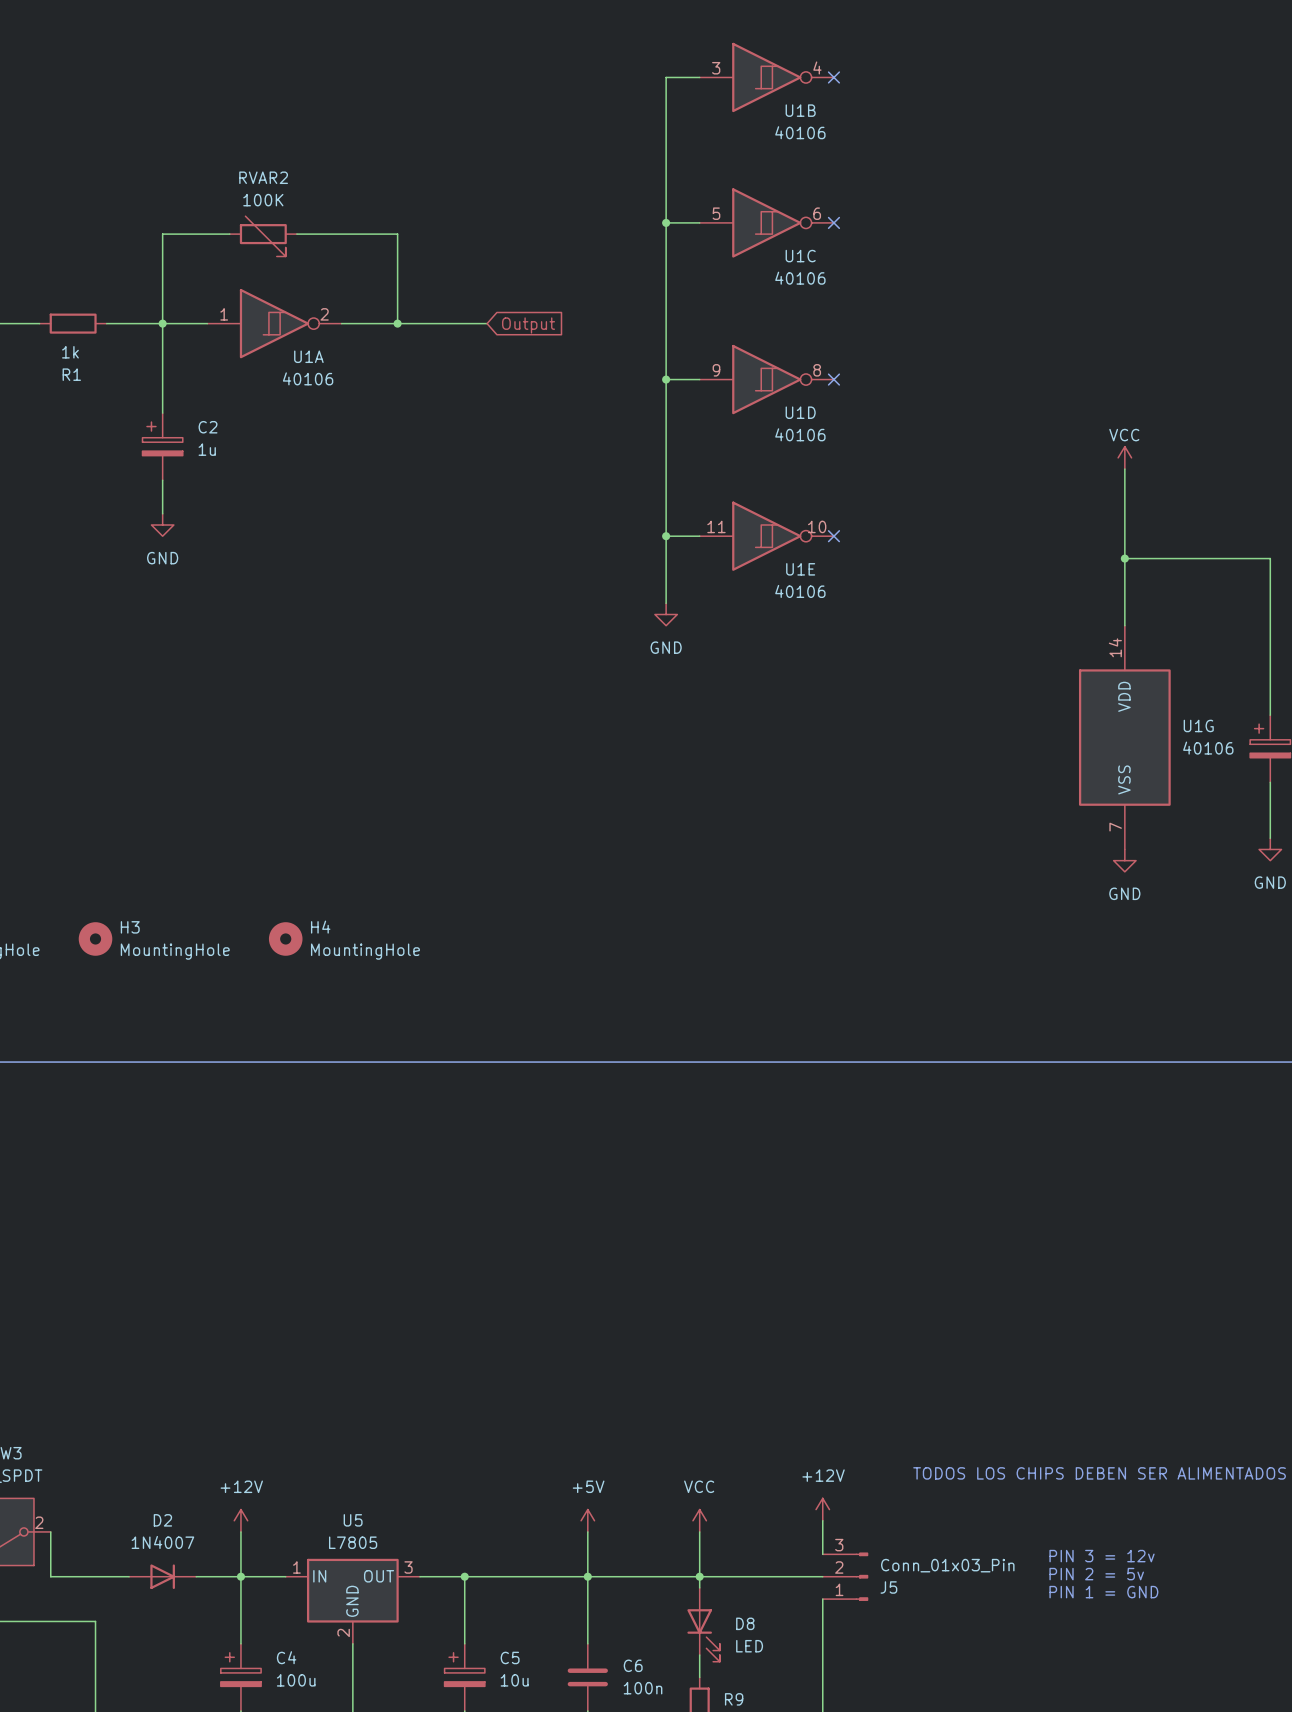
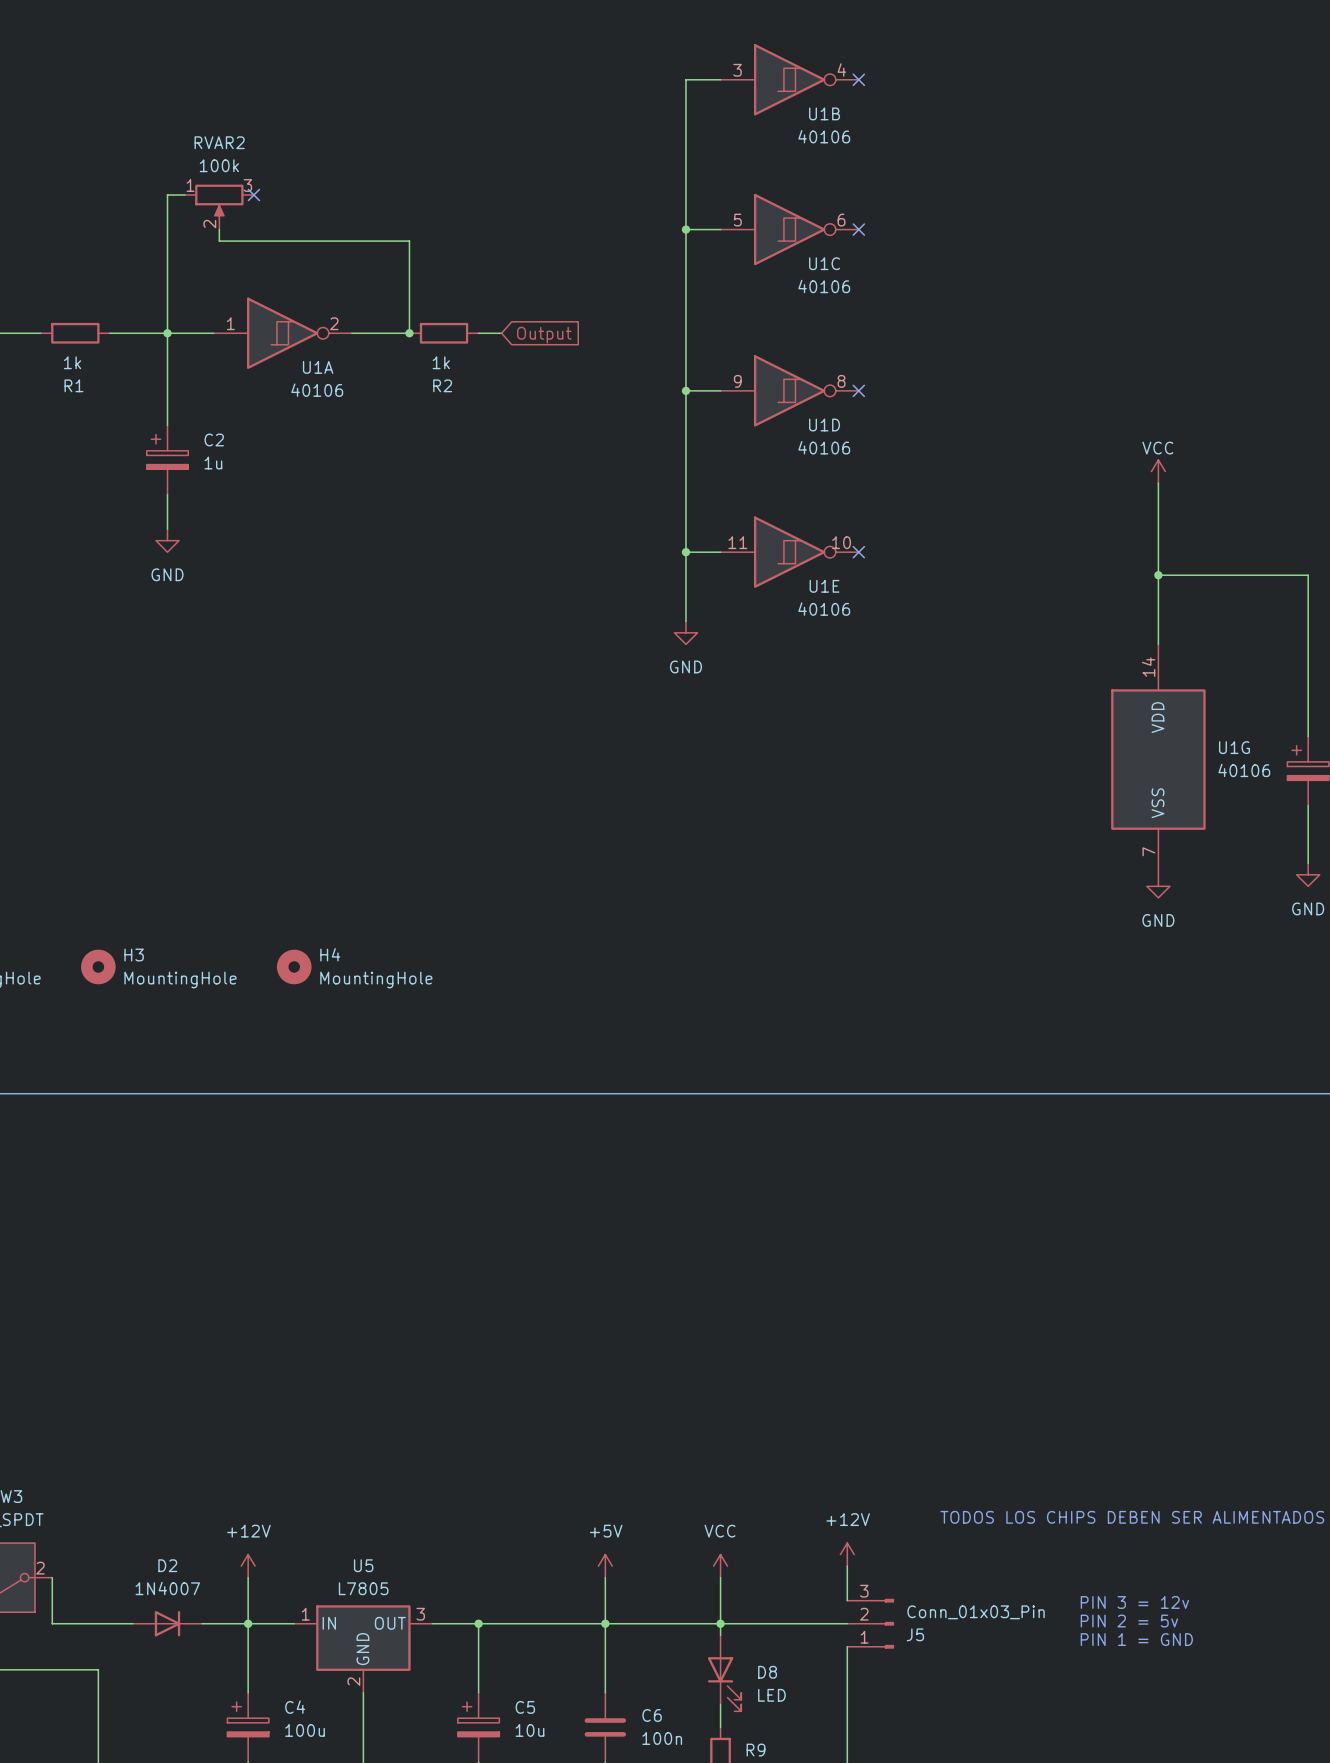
wire: none -> (184, 195) (167, 195) (167, 241)
no-connect mark: none -> (253, 195)
RVAR2 value: 100K (263, 200) -> 100k (219, 165)
RVAR2 symbol: [229, 216, 297, 257] -> [184, 184, 254, 230]
wire: (162, 234) (212, 234) -> (219, 229) (219, 241)
wire: (397, 323) (464, 323) -> (236, 241) (305, 241)
R2: none -> 1k (444, 333)

